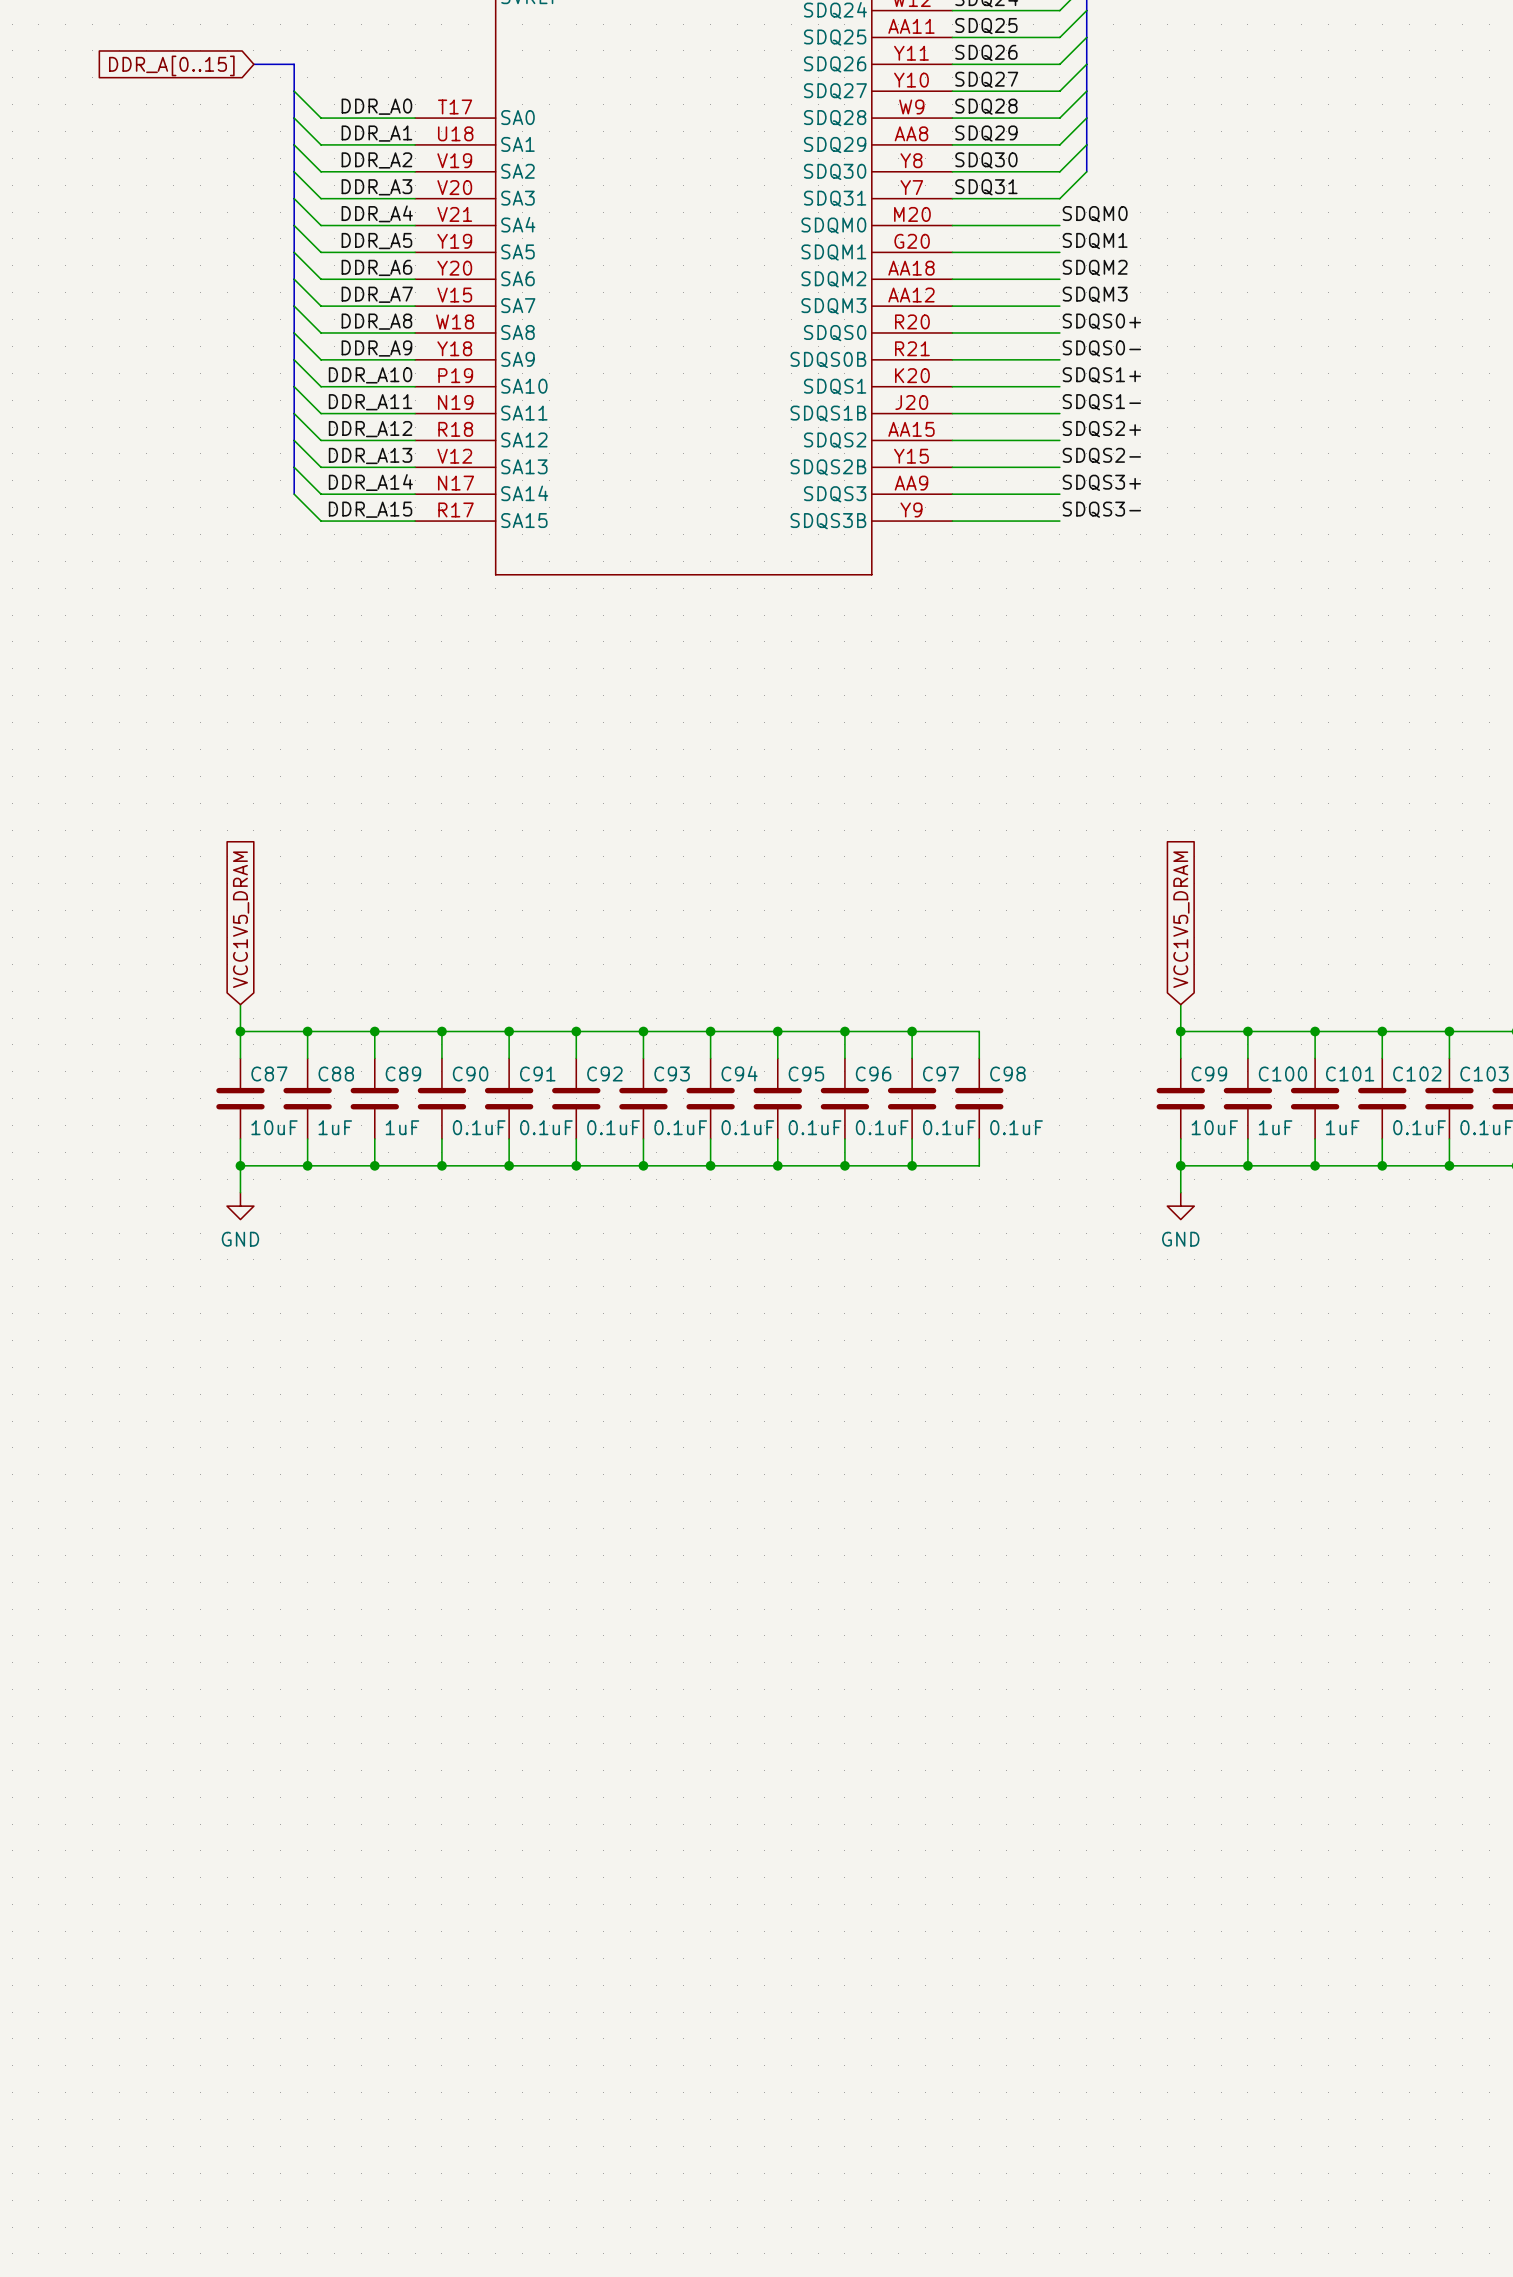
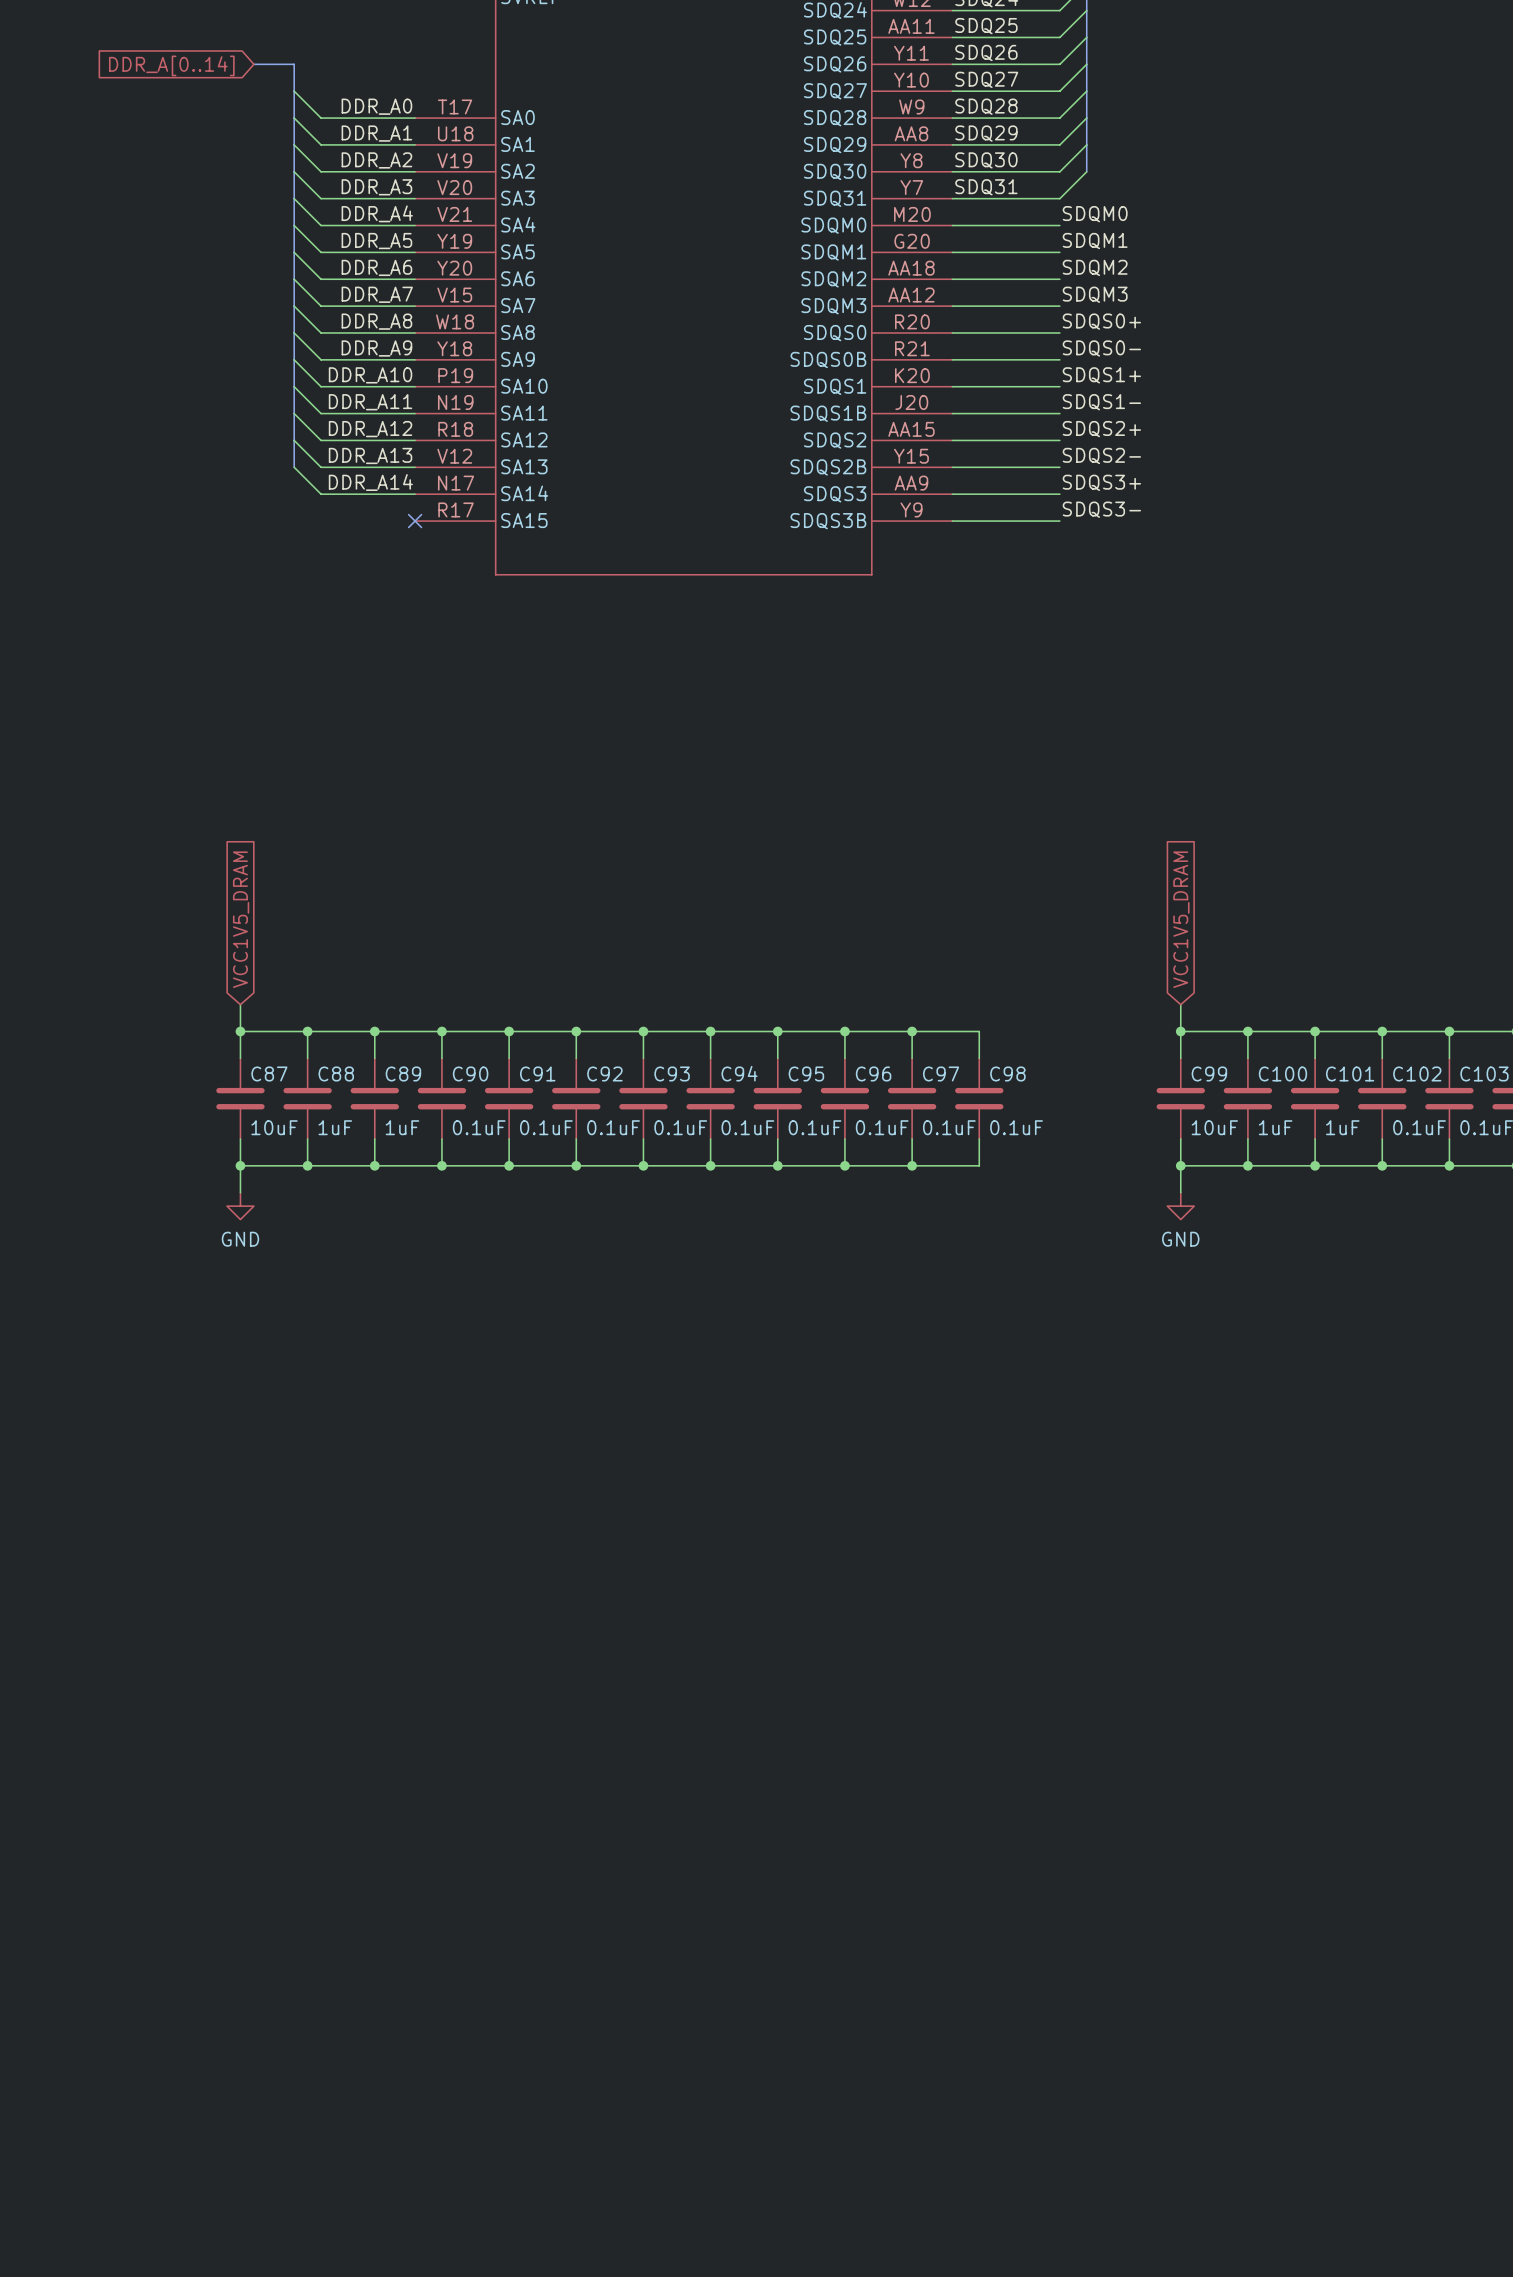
global label: DDR_A[0..15] (171, 65) -> DDR_A[0..14] (171, 65)
bus: (294, 467) (294, 494) -> none
wire: (294, 494) (321, 521) (415, 521) -> none
label: DDR_A15 (370, 509) -> none
no-connect mark: none -> (415, 521)

